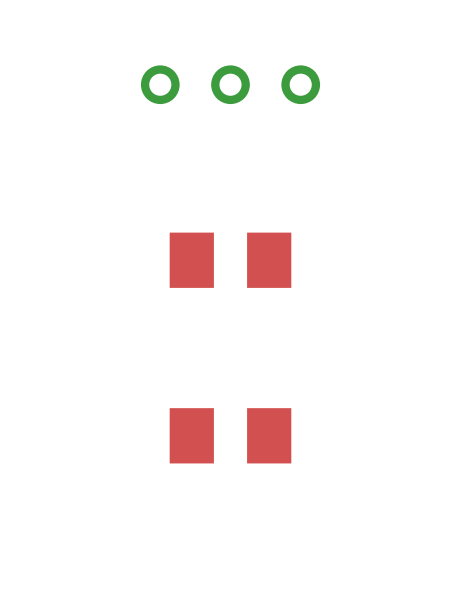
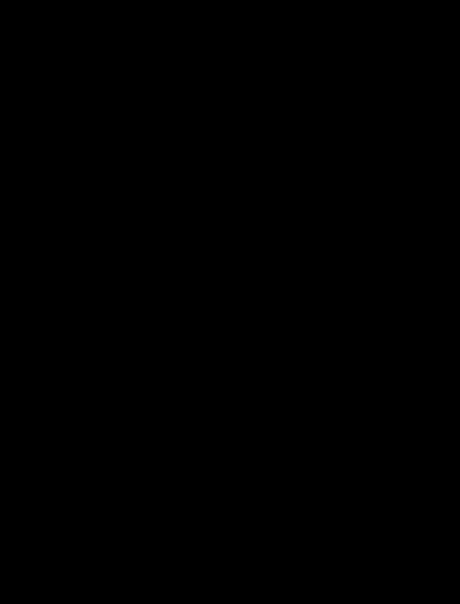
part: (230, 84) -> none
part: (230, 260) -> none
part: (230, 435) -> none

